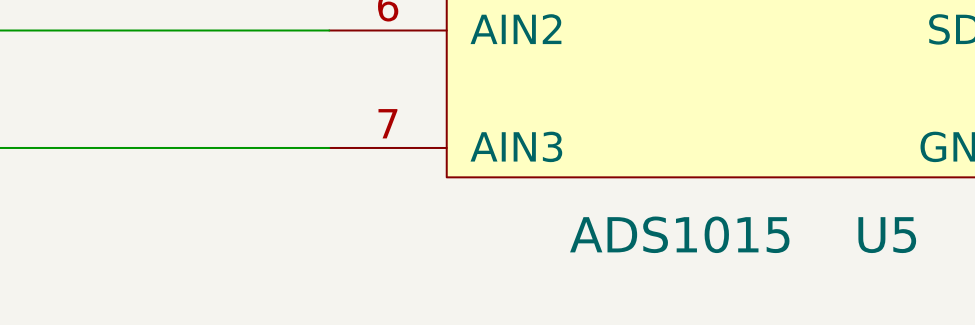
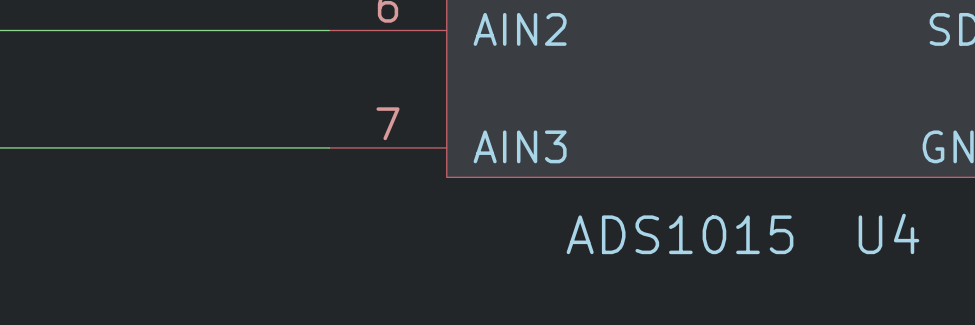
U5 name: U5 (887, 235) -> U4 (888, 233)

